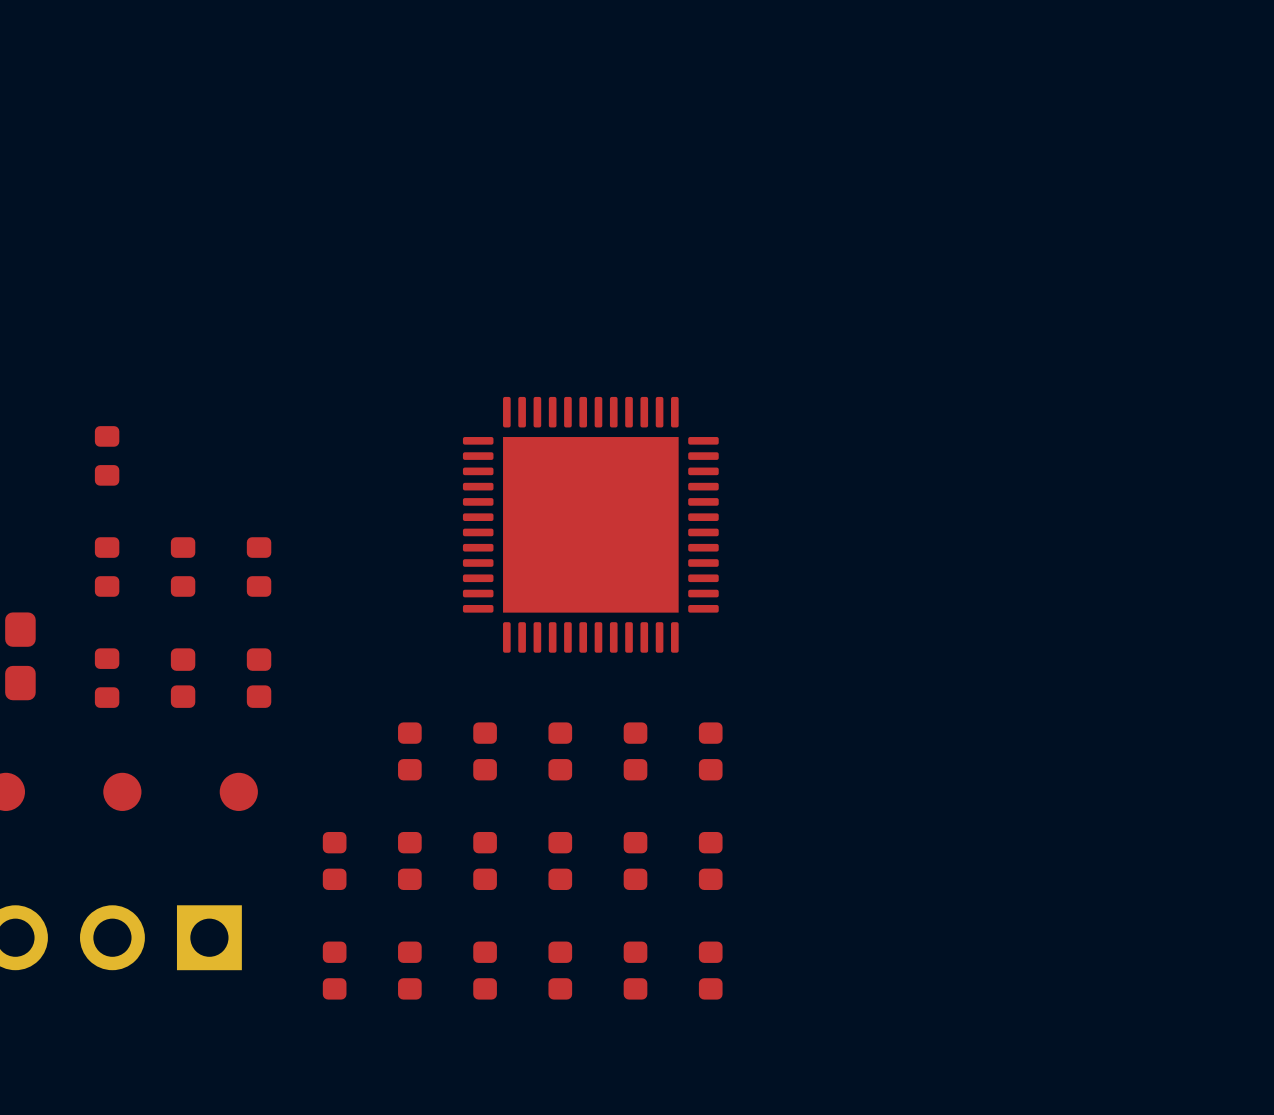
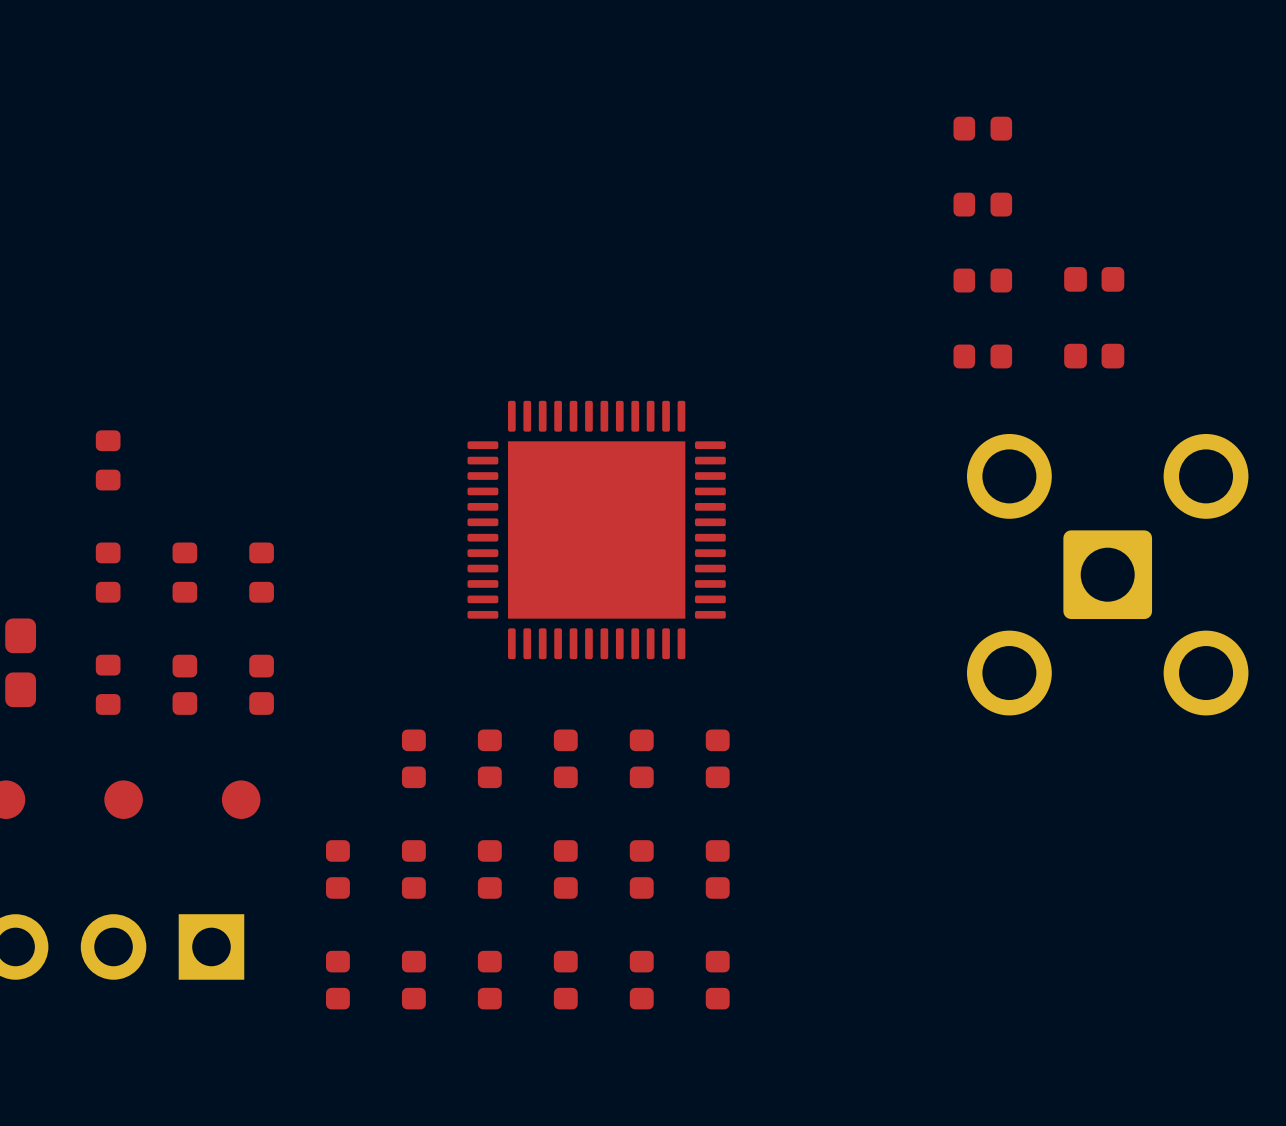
part: none -> (982, 128)
part: none -> (982, 204)
part: none -> (1094, 279)
part: none -> (982, 280)
part: none -> (1094, 356)
part: none -> (982, 356)
part: none -> (1107, 574)

